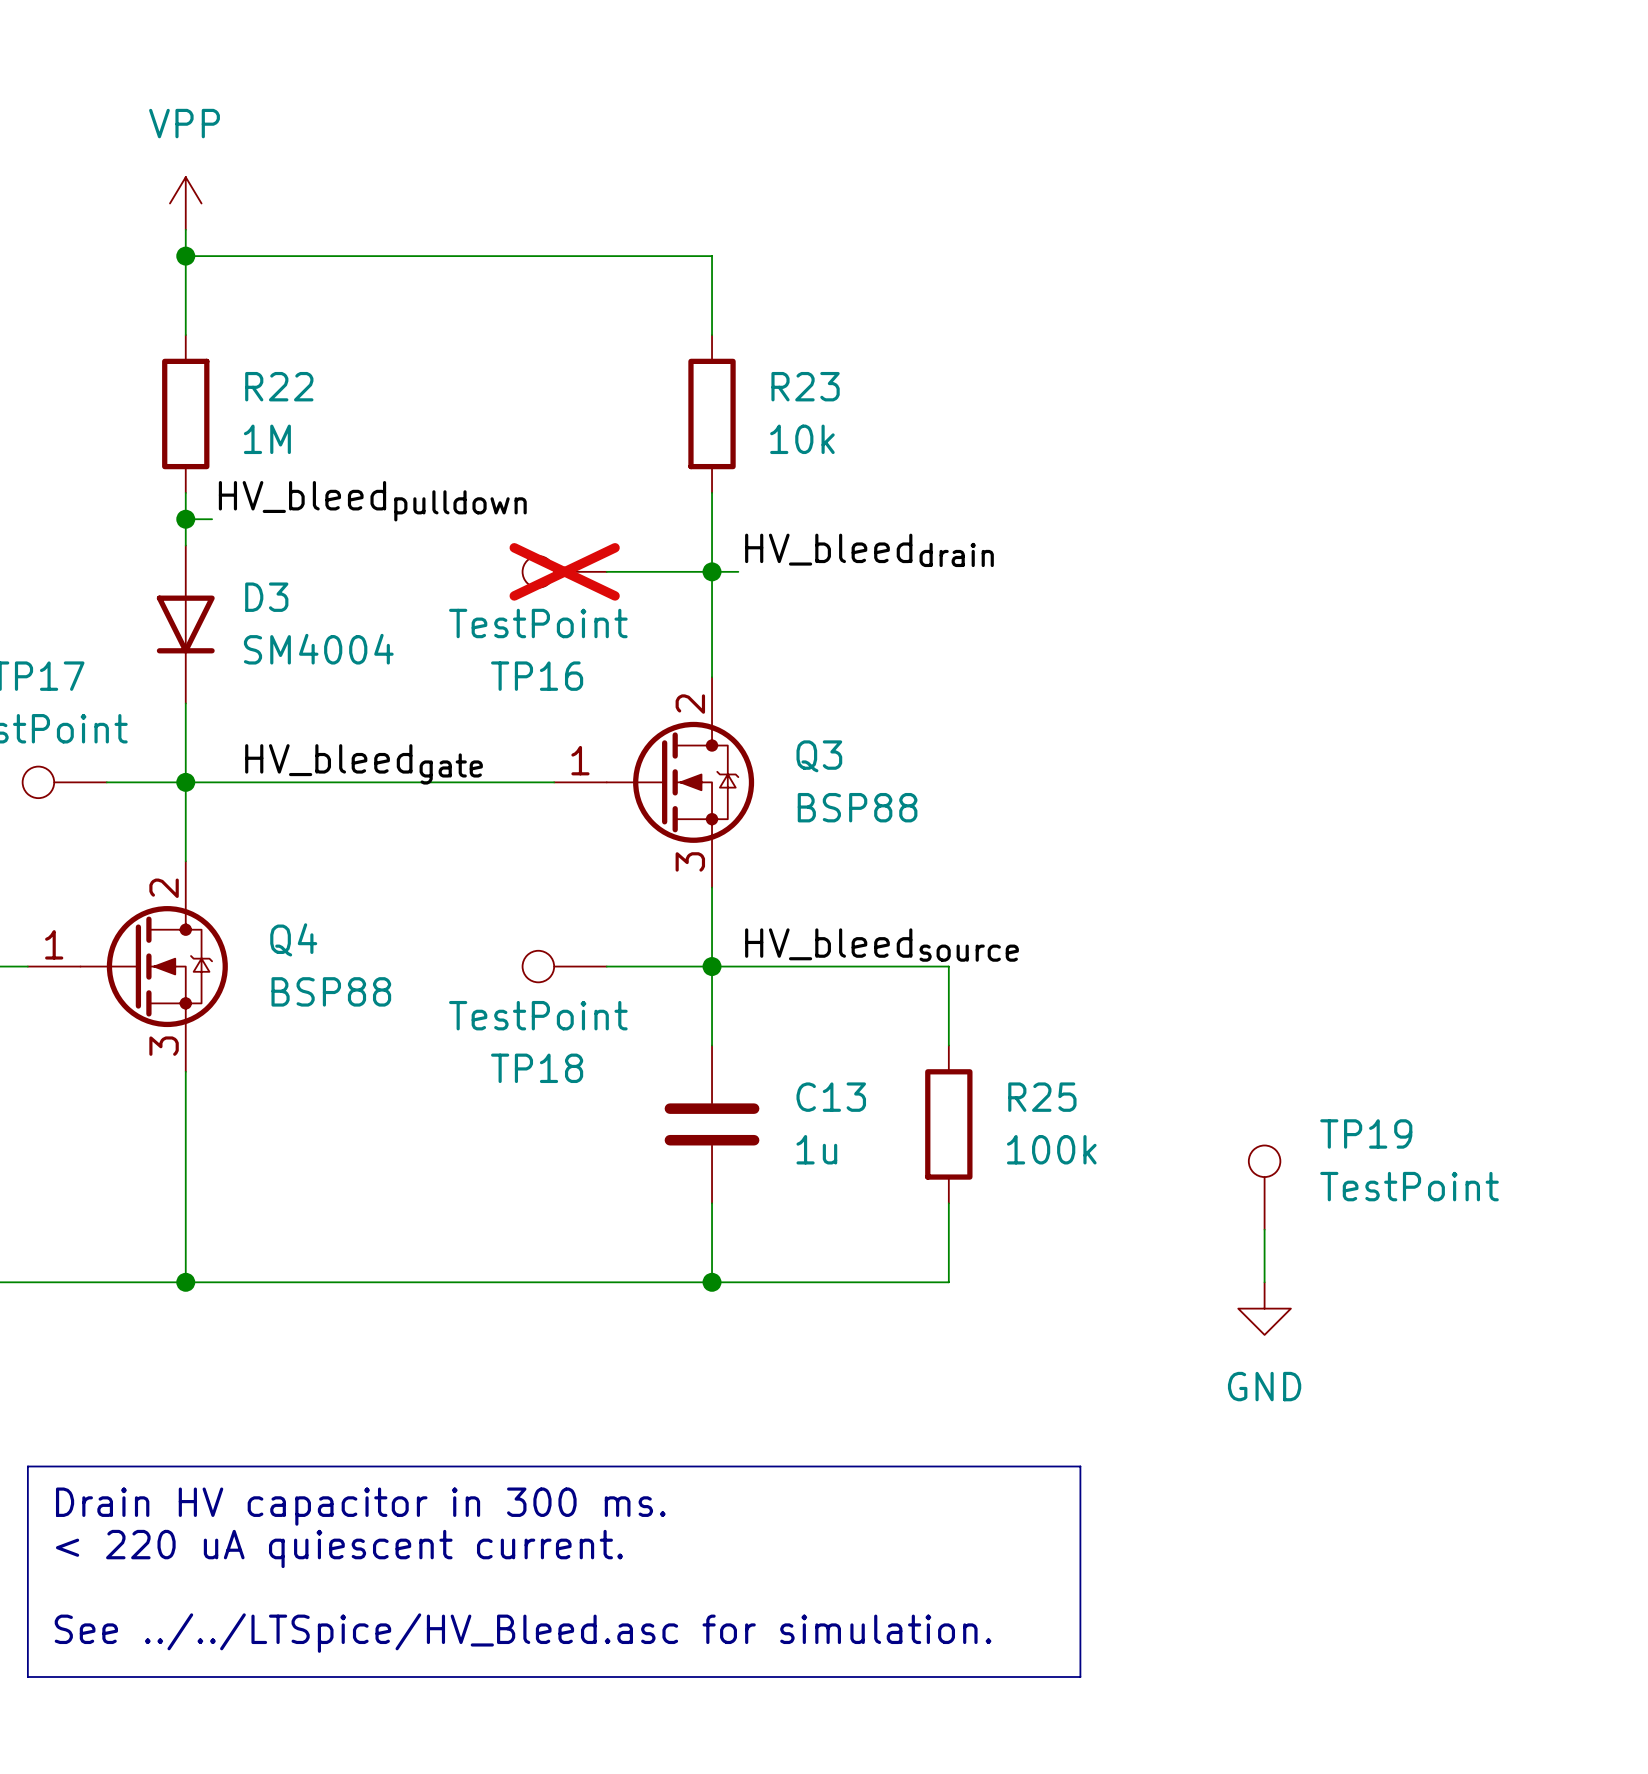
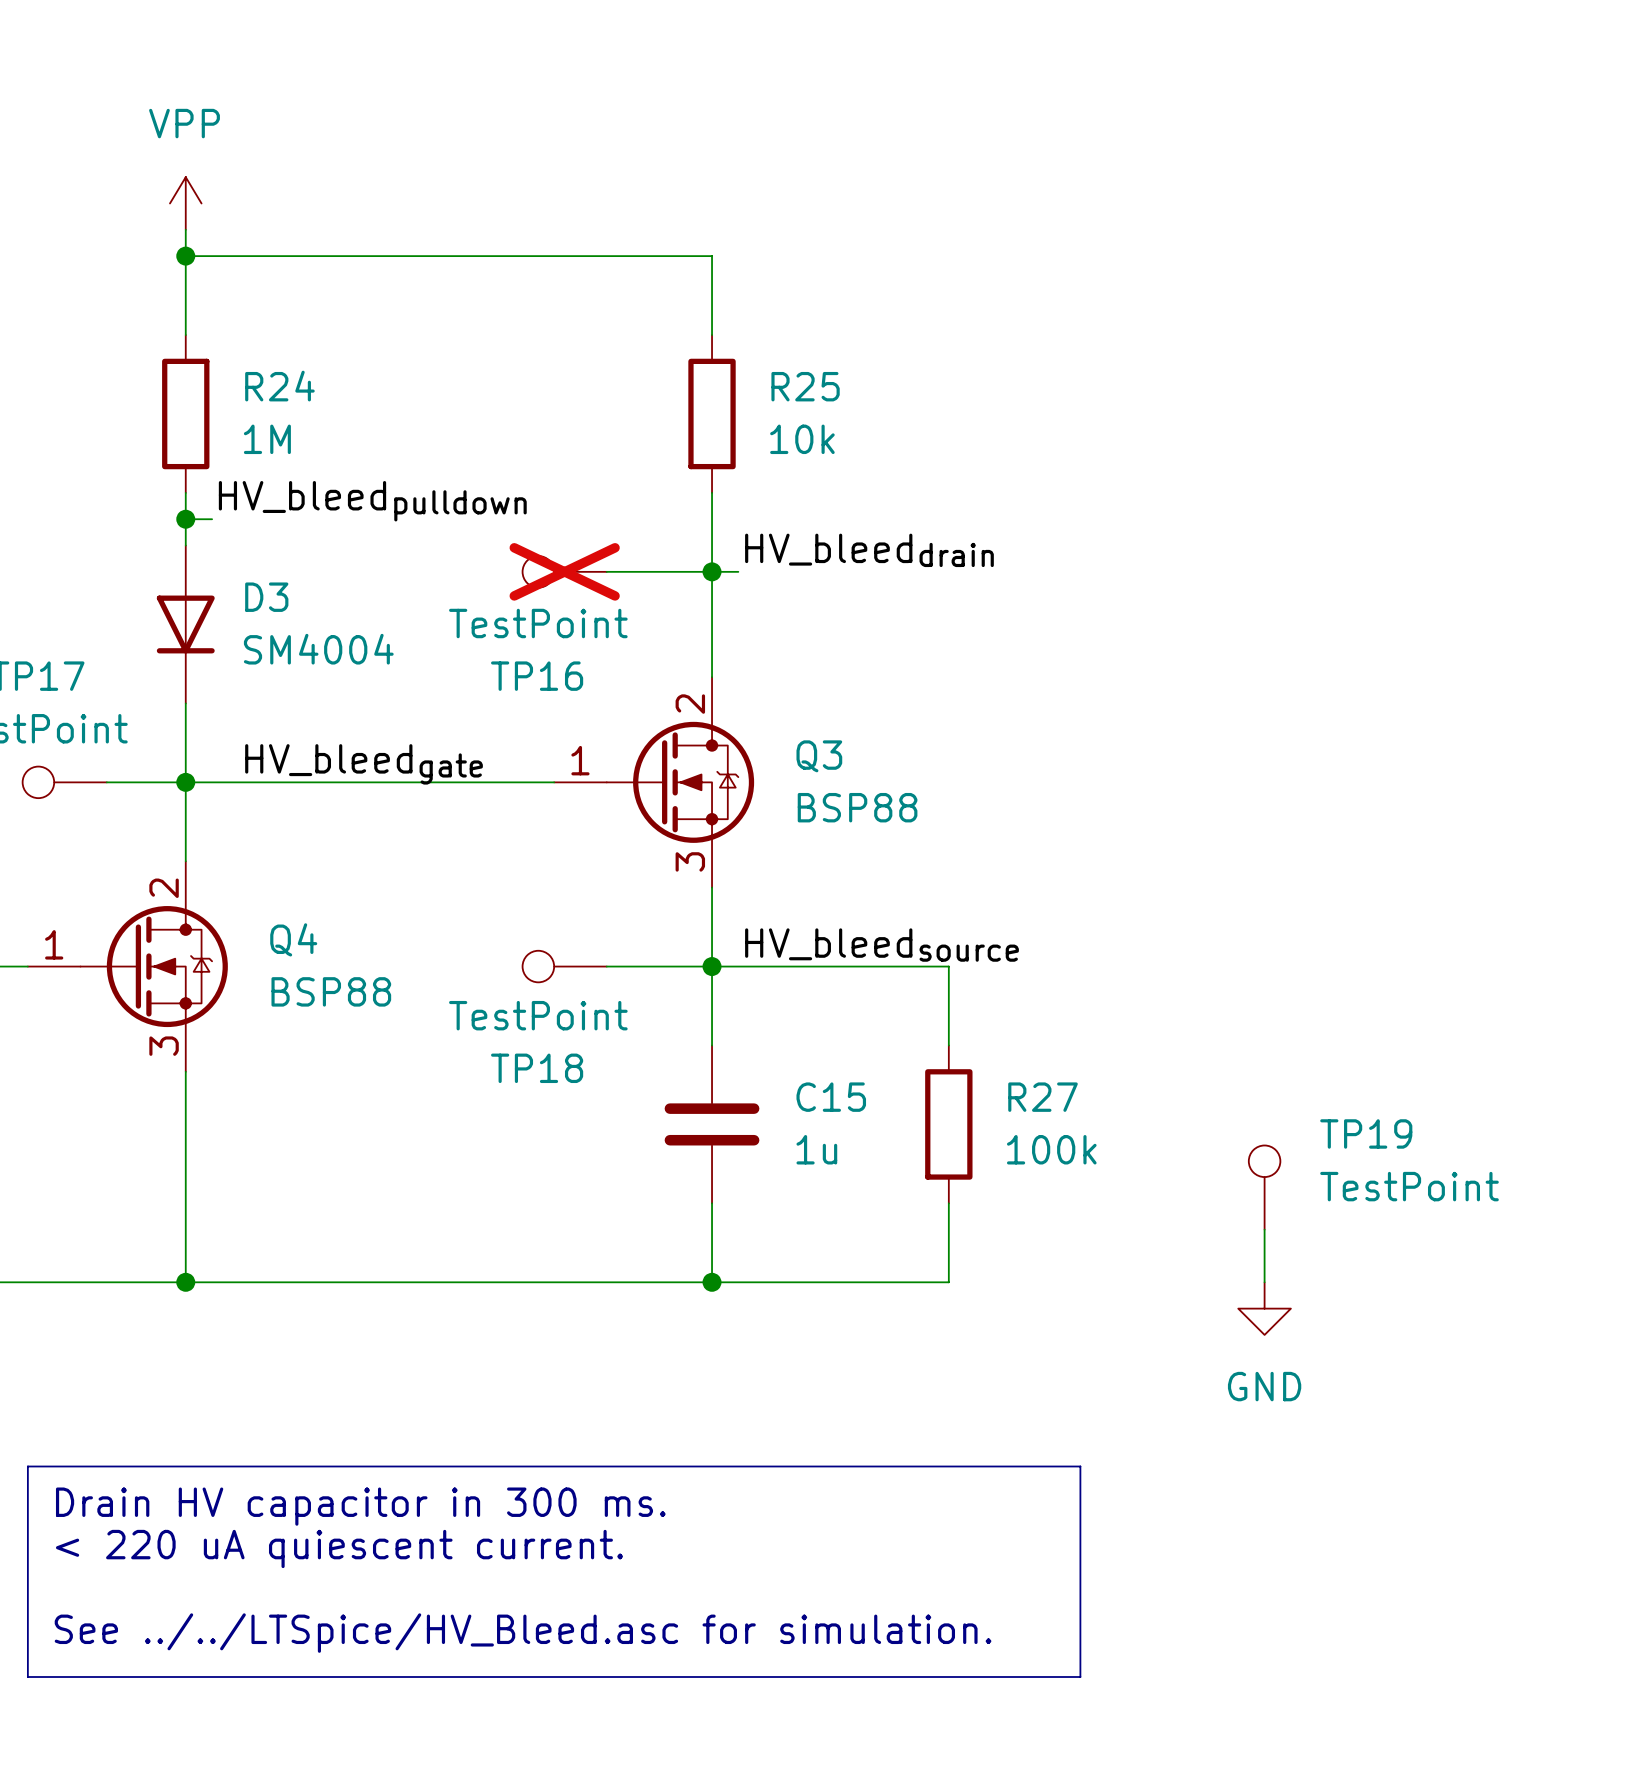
R22 name: R22 (279, 386) -> R24 (279, 386)
R23 name: R23 (805, 386) -> R25 (805, 386)
C13 name: C13 (831, 1097) -> C15 (831, 1097)
R25 name: R25 (1042, 1097) -> R27 (1043, 1097)

